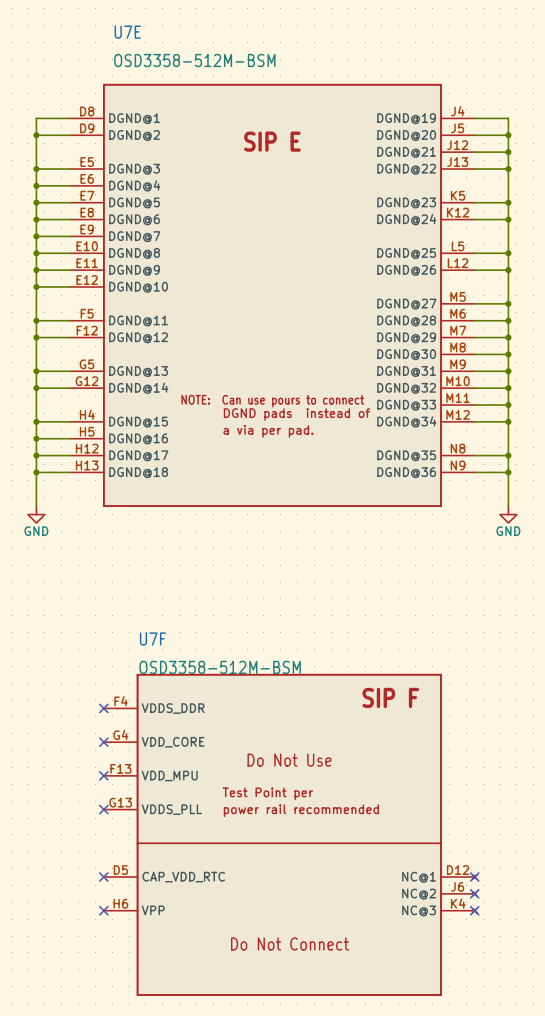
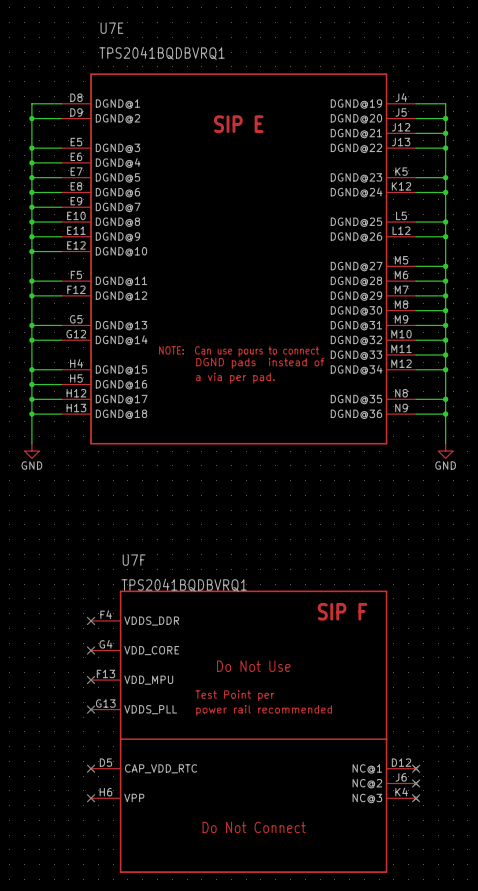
U7E value: OSD3358-512M-BSM (194, 60) -> TPS2041BQDBVRQ1 (162, 53)
U7F value: OSD3358-512M-BSM (220, 667) -> TPS2041BQDBVRQ1 (184, 585)

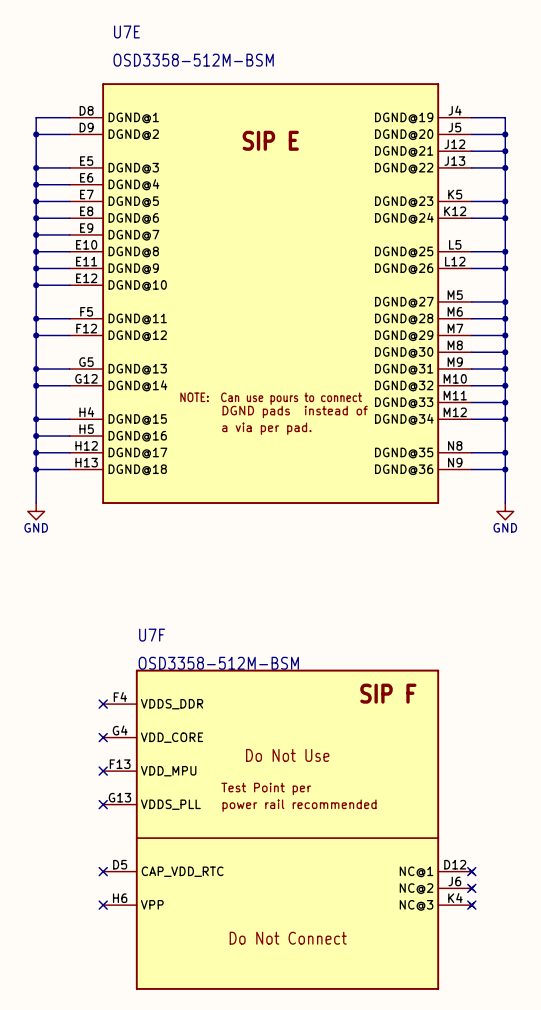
U7E value: TPS2041BQDBVRQ1 (162, 53) -> OSD3358-512M-BSM (193, 60)
U7F value: TPS2041BQDBVRQ1 (184, 585) -> OSD3358-512M-BSM (218, 663)

